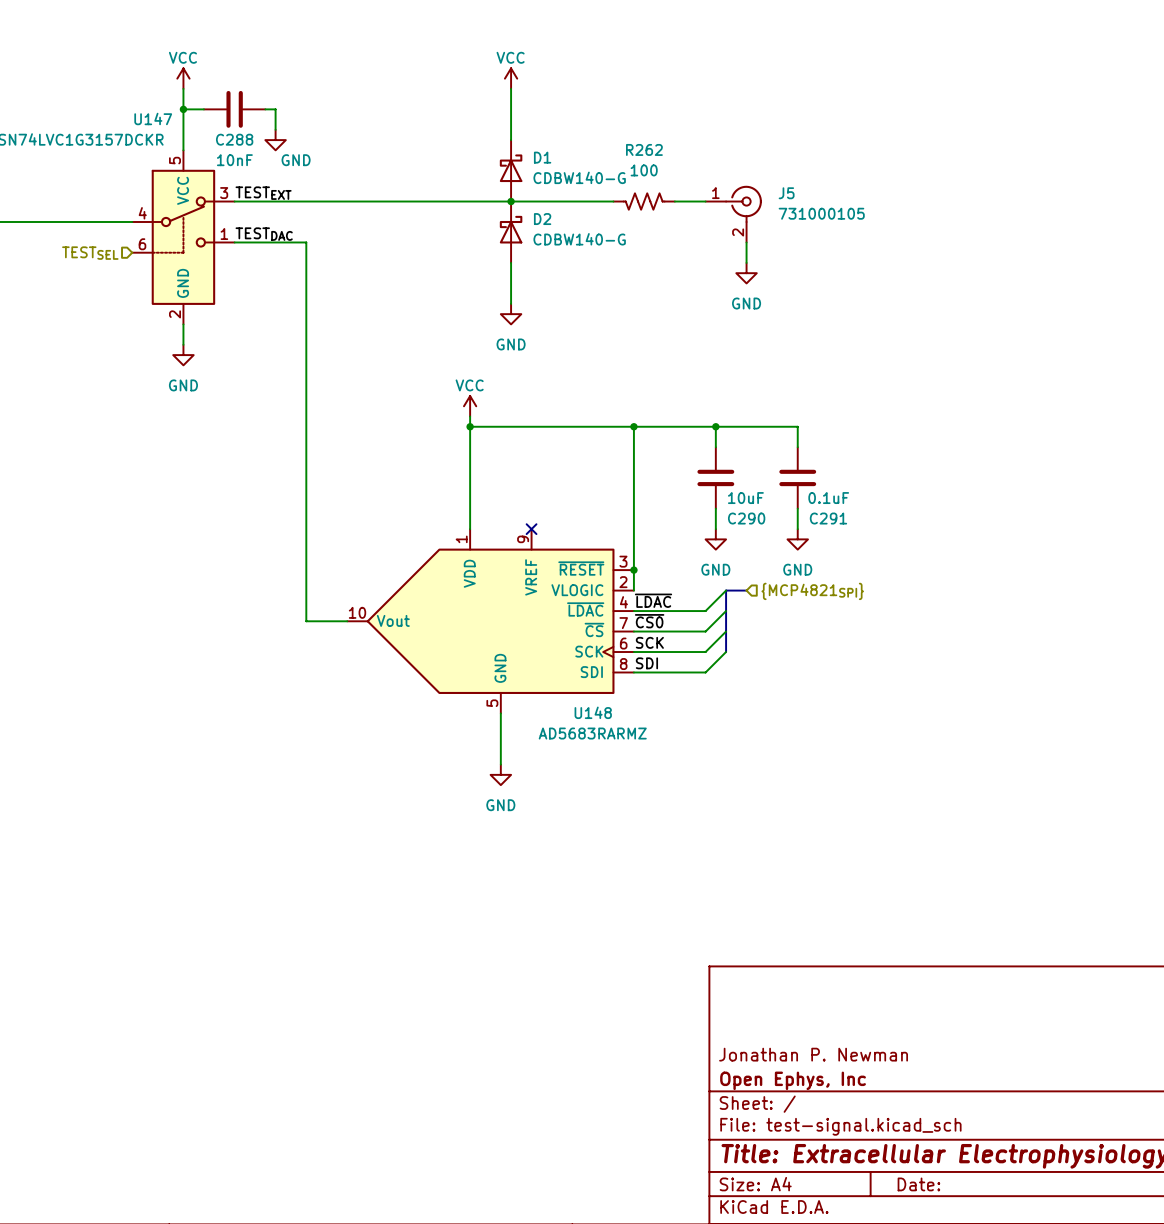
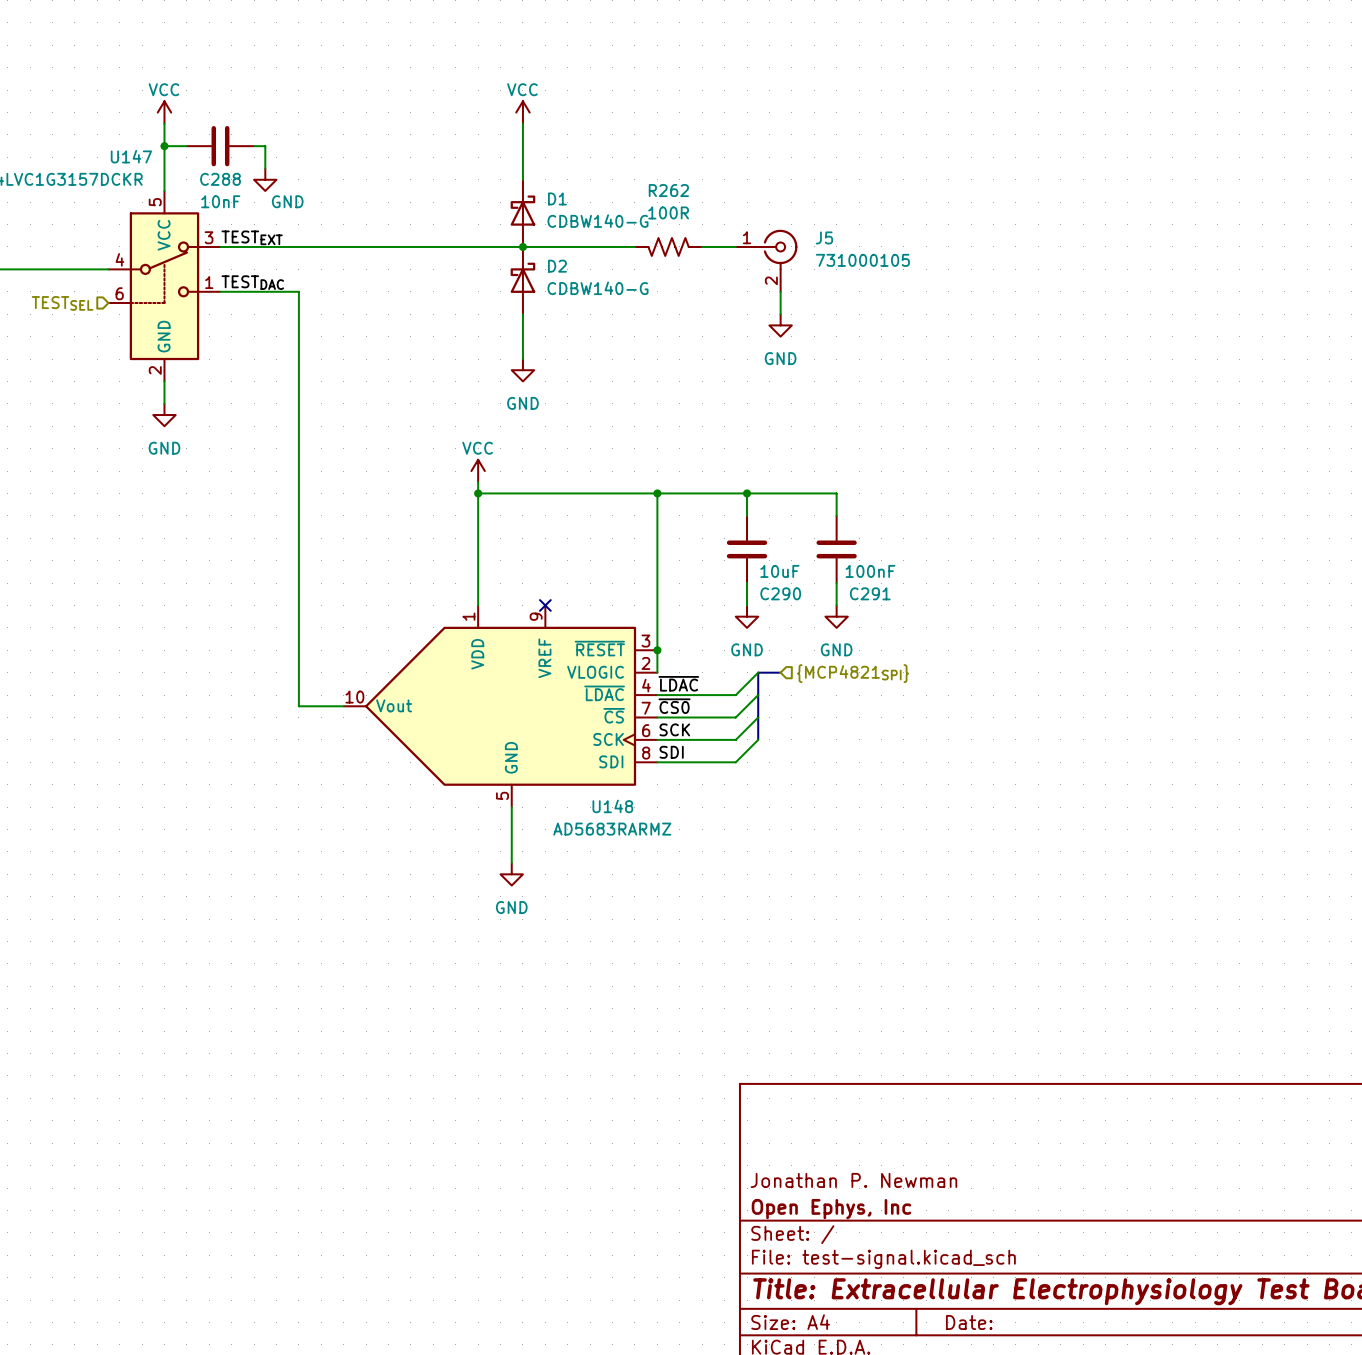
R262 value: 100 (644, 170) -> 100R (668, 212)
C291 value: 0.1uF (828, 498) -> 100nF (870, 571)

